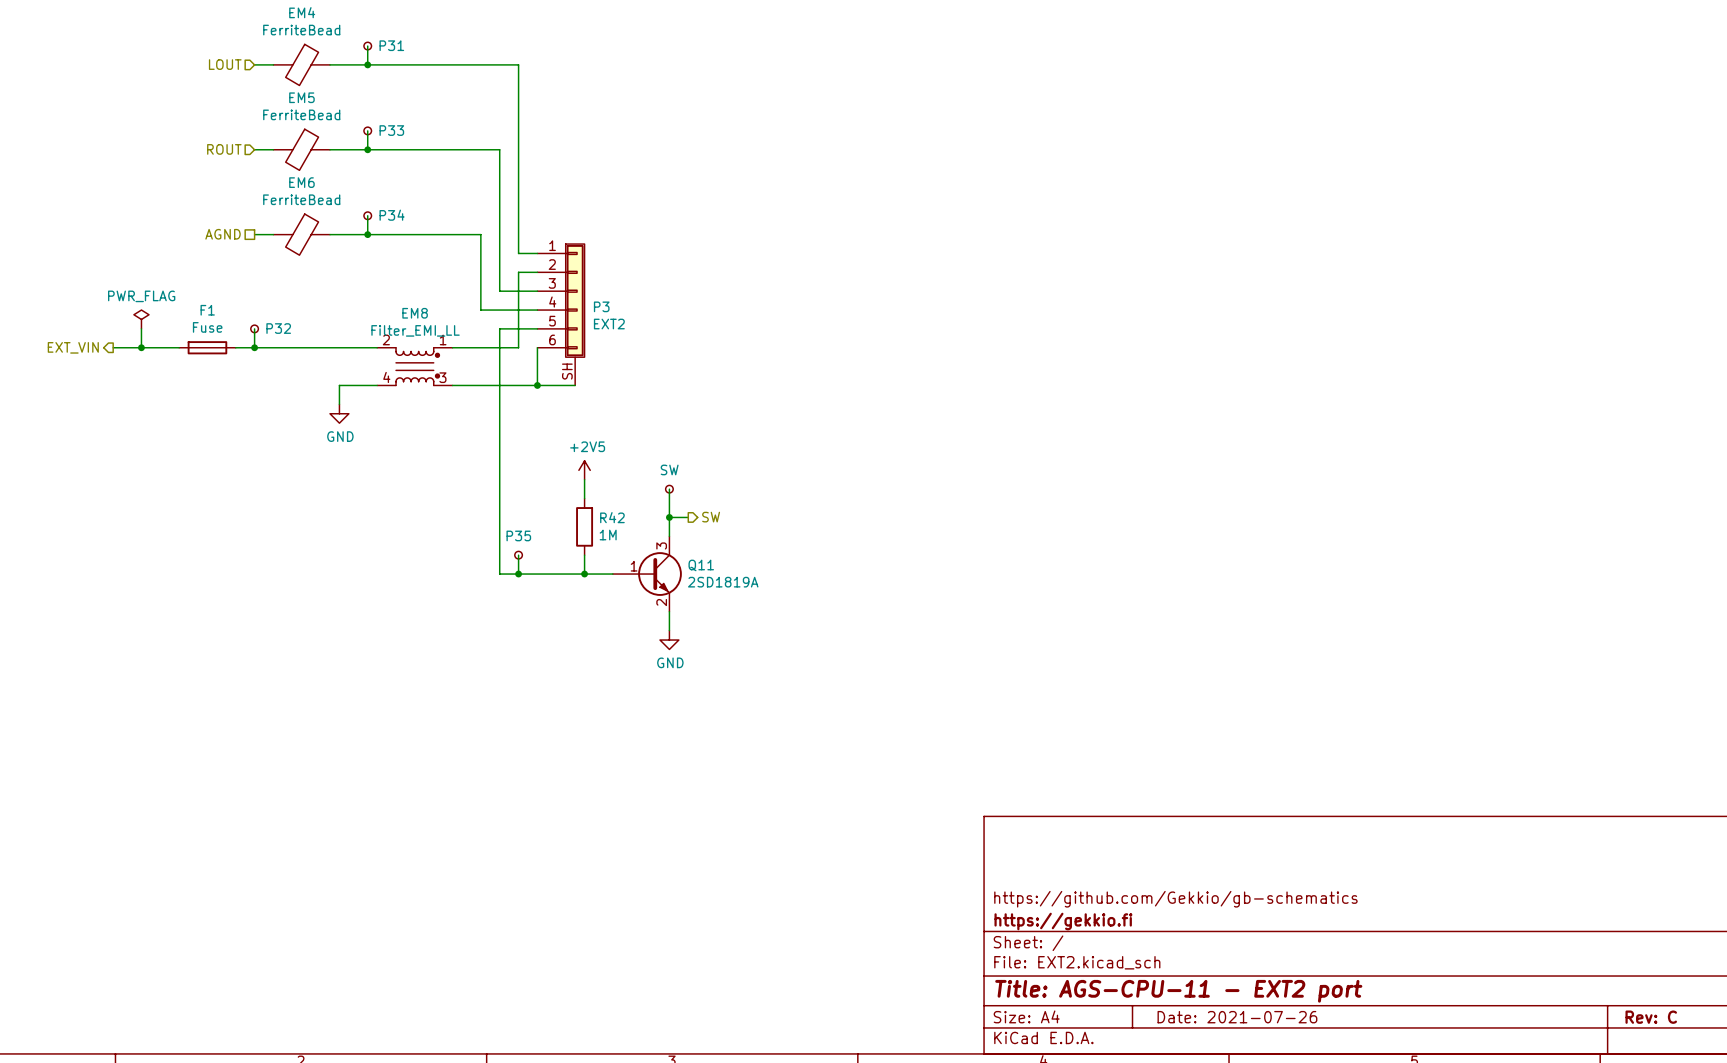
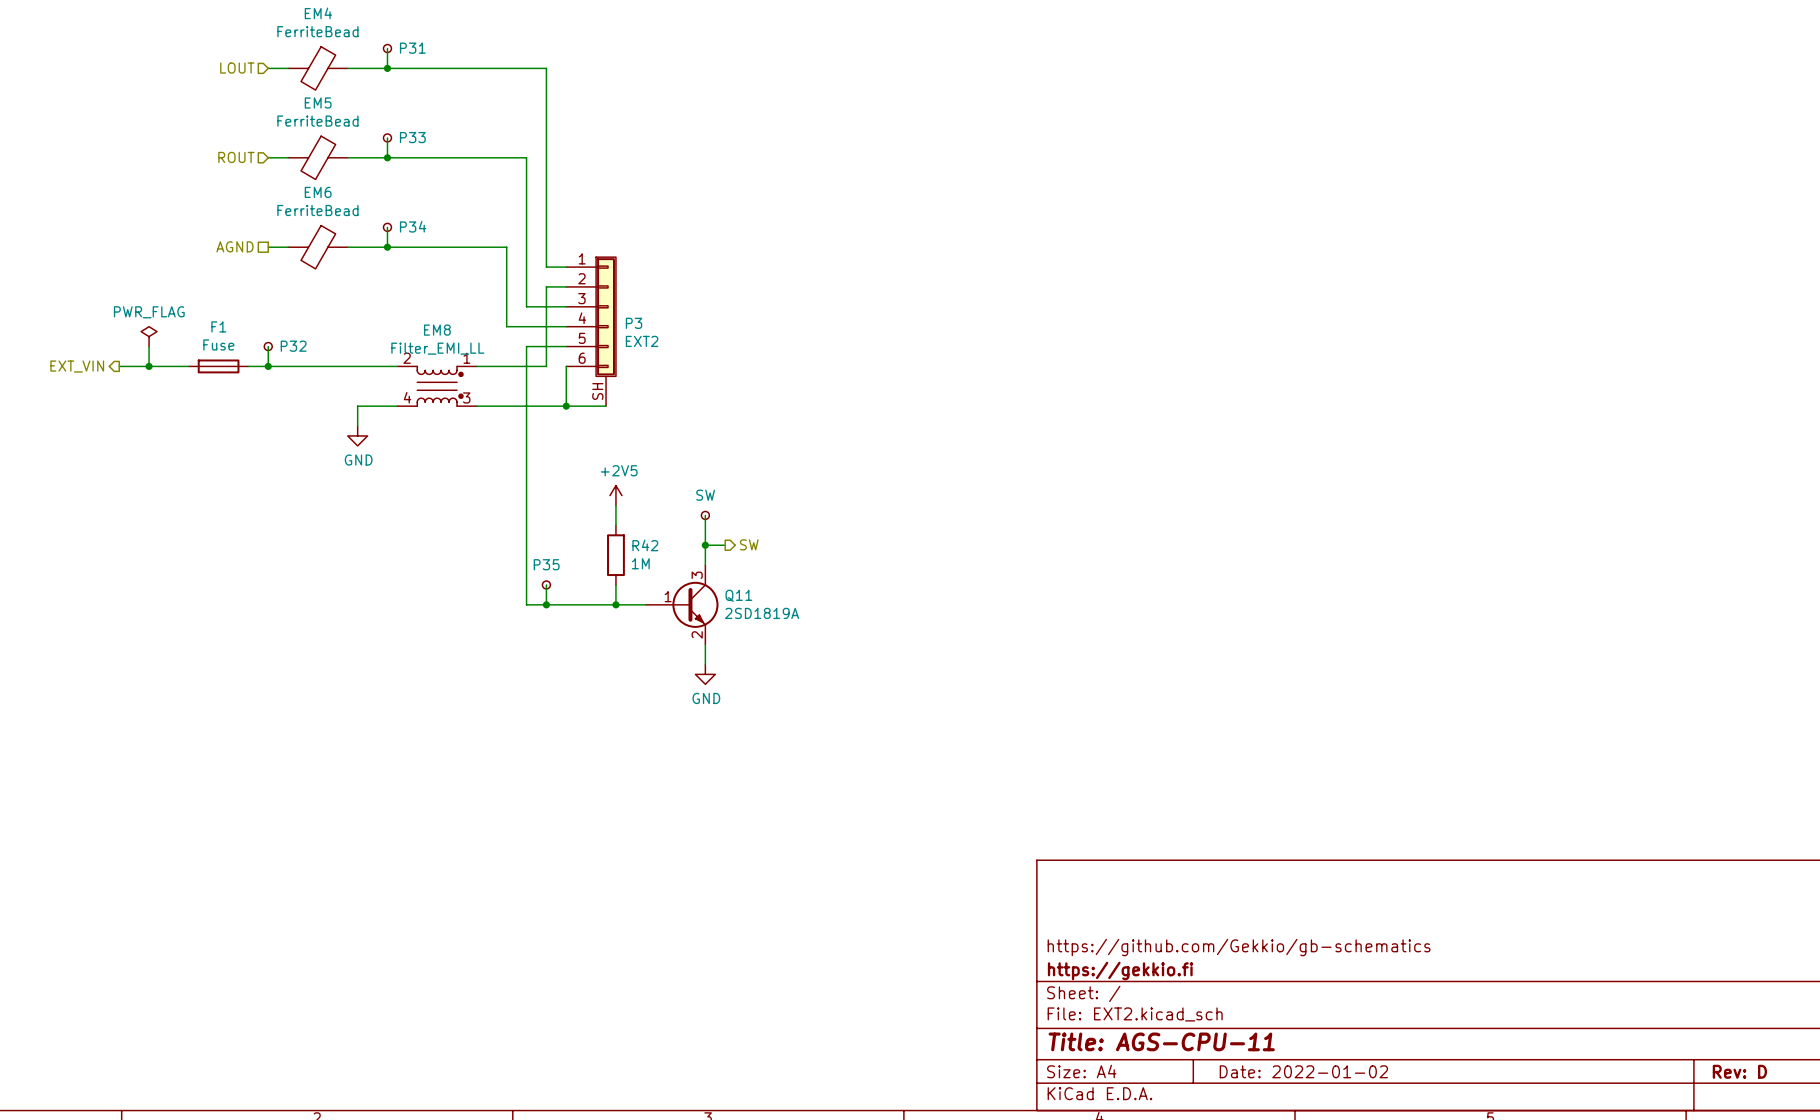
title block: Title: AGS-CPU-11 - EXT2 port (1178, 991) -> Title: AGS-CPU-11 (1161, 1041)
title block: Date: 2021-07-26 (1237, 1017) -> Date: 2022-01-02 (1303, 1071)
title block: Rev: C (1651, 1017) -> Rev: D (1739, 1071)

